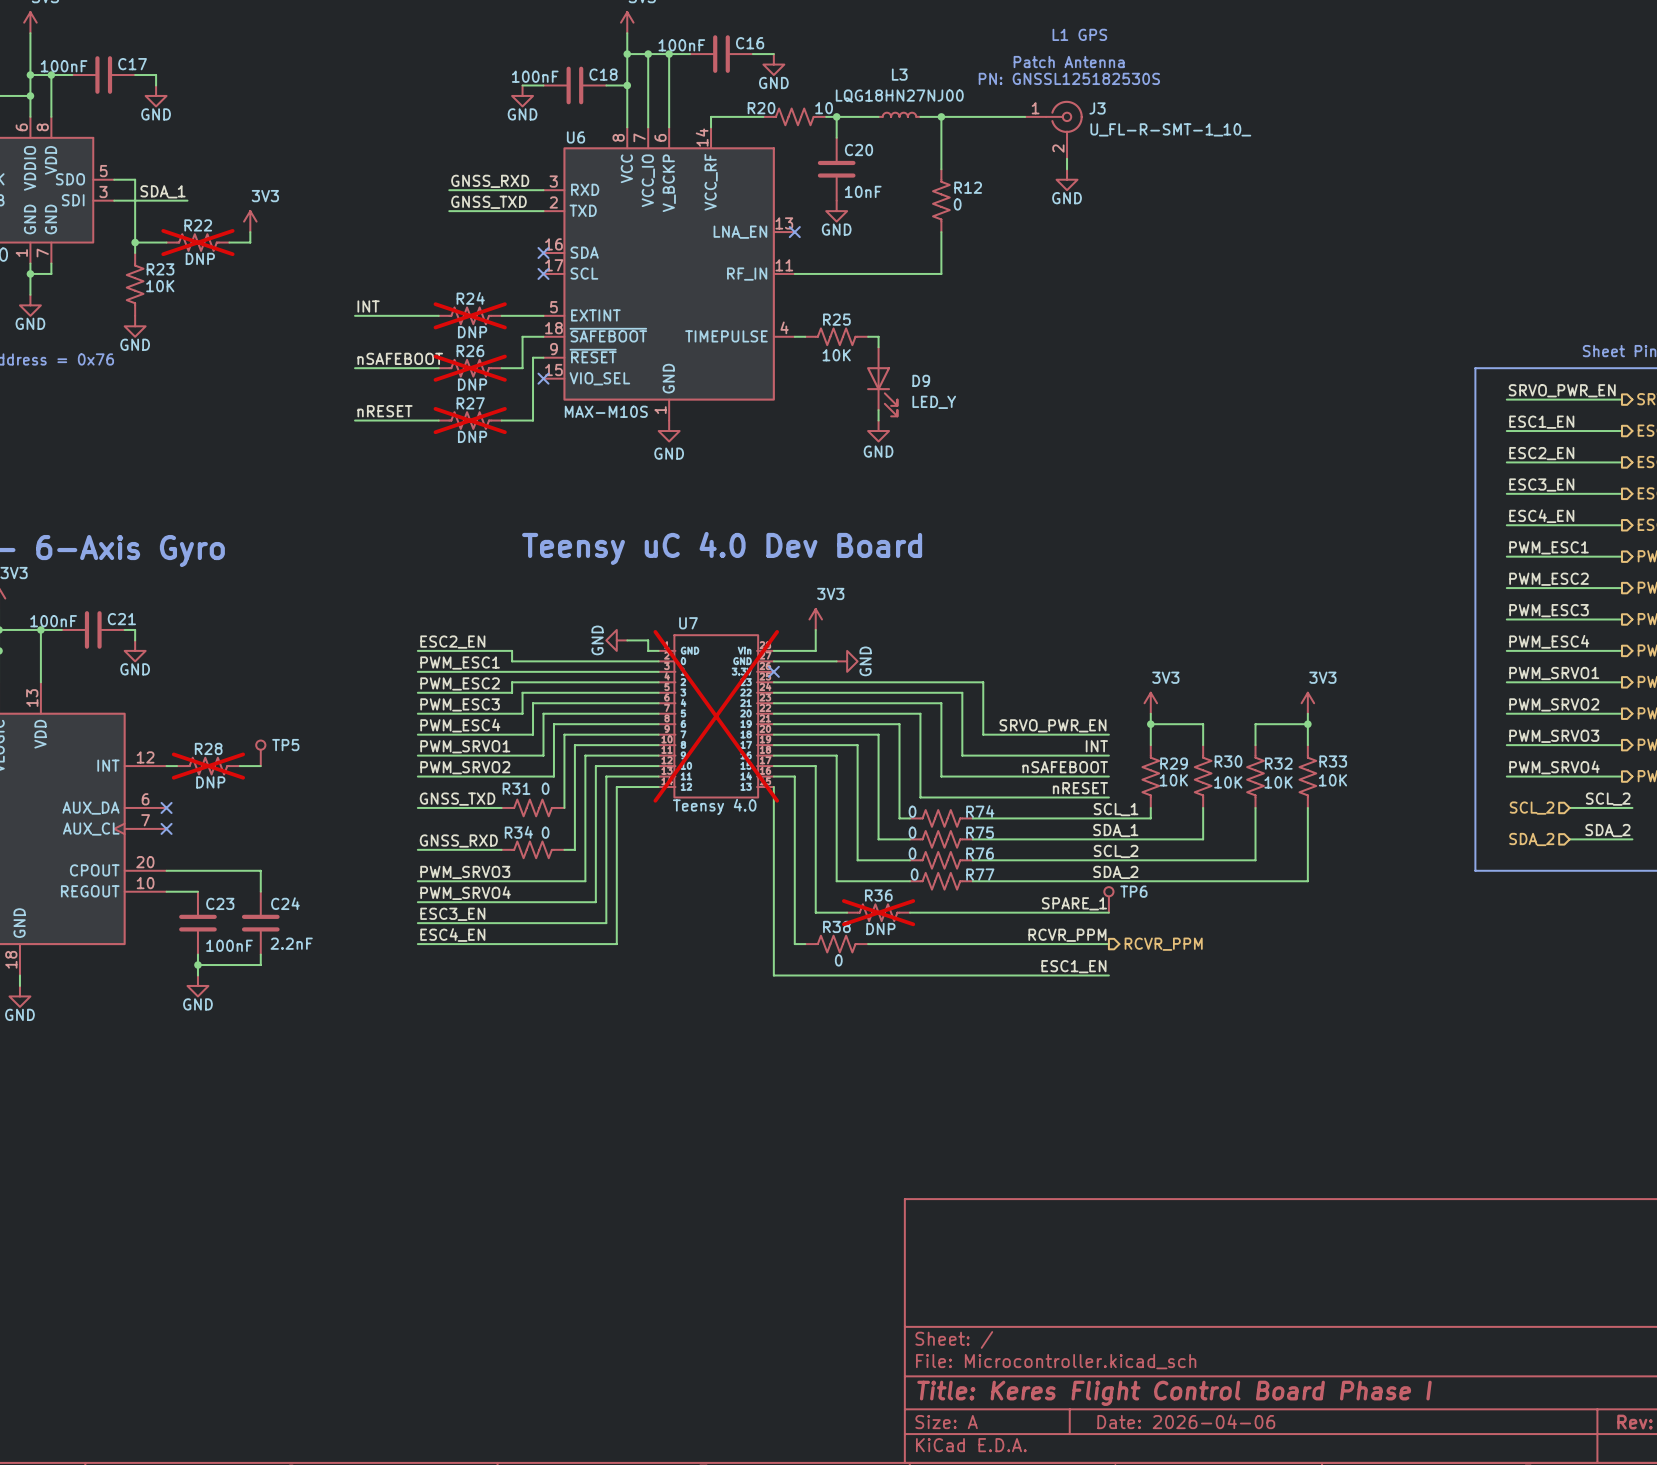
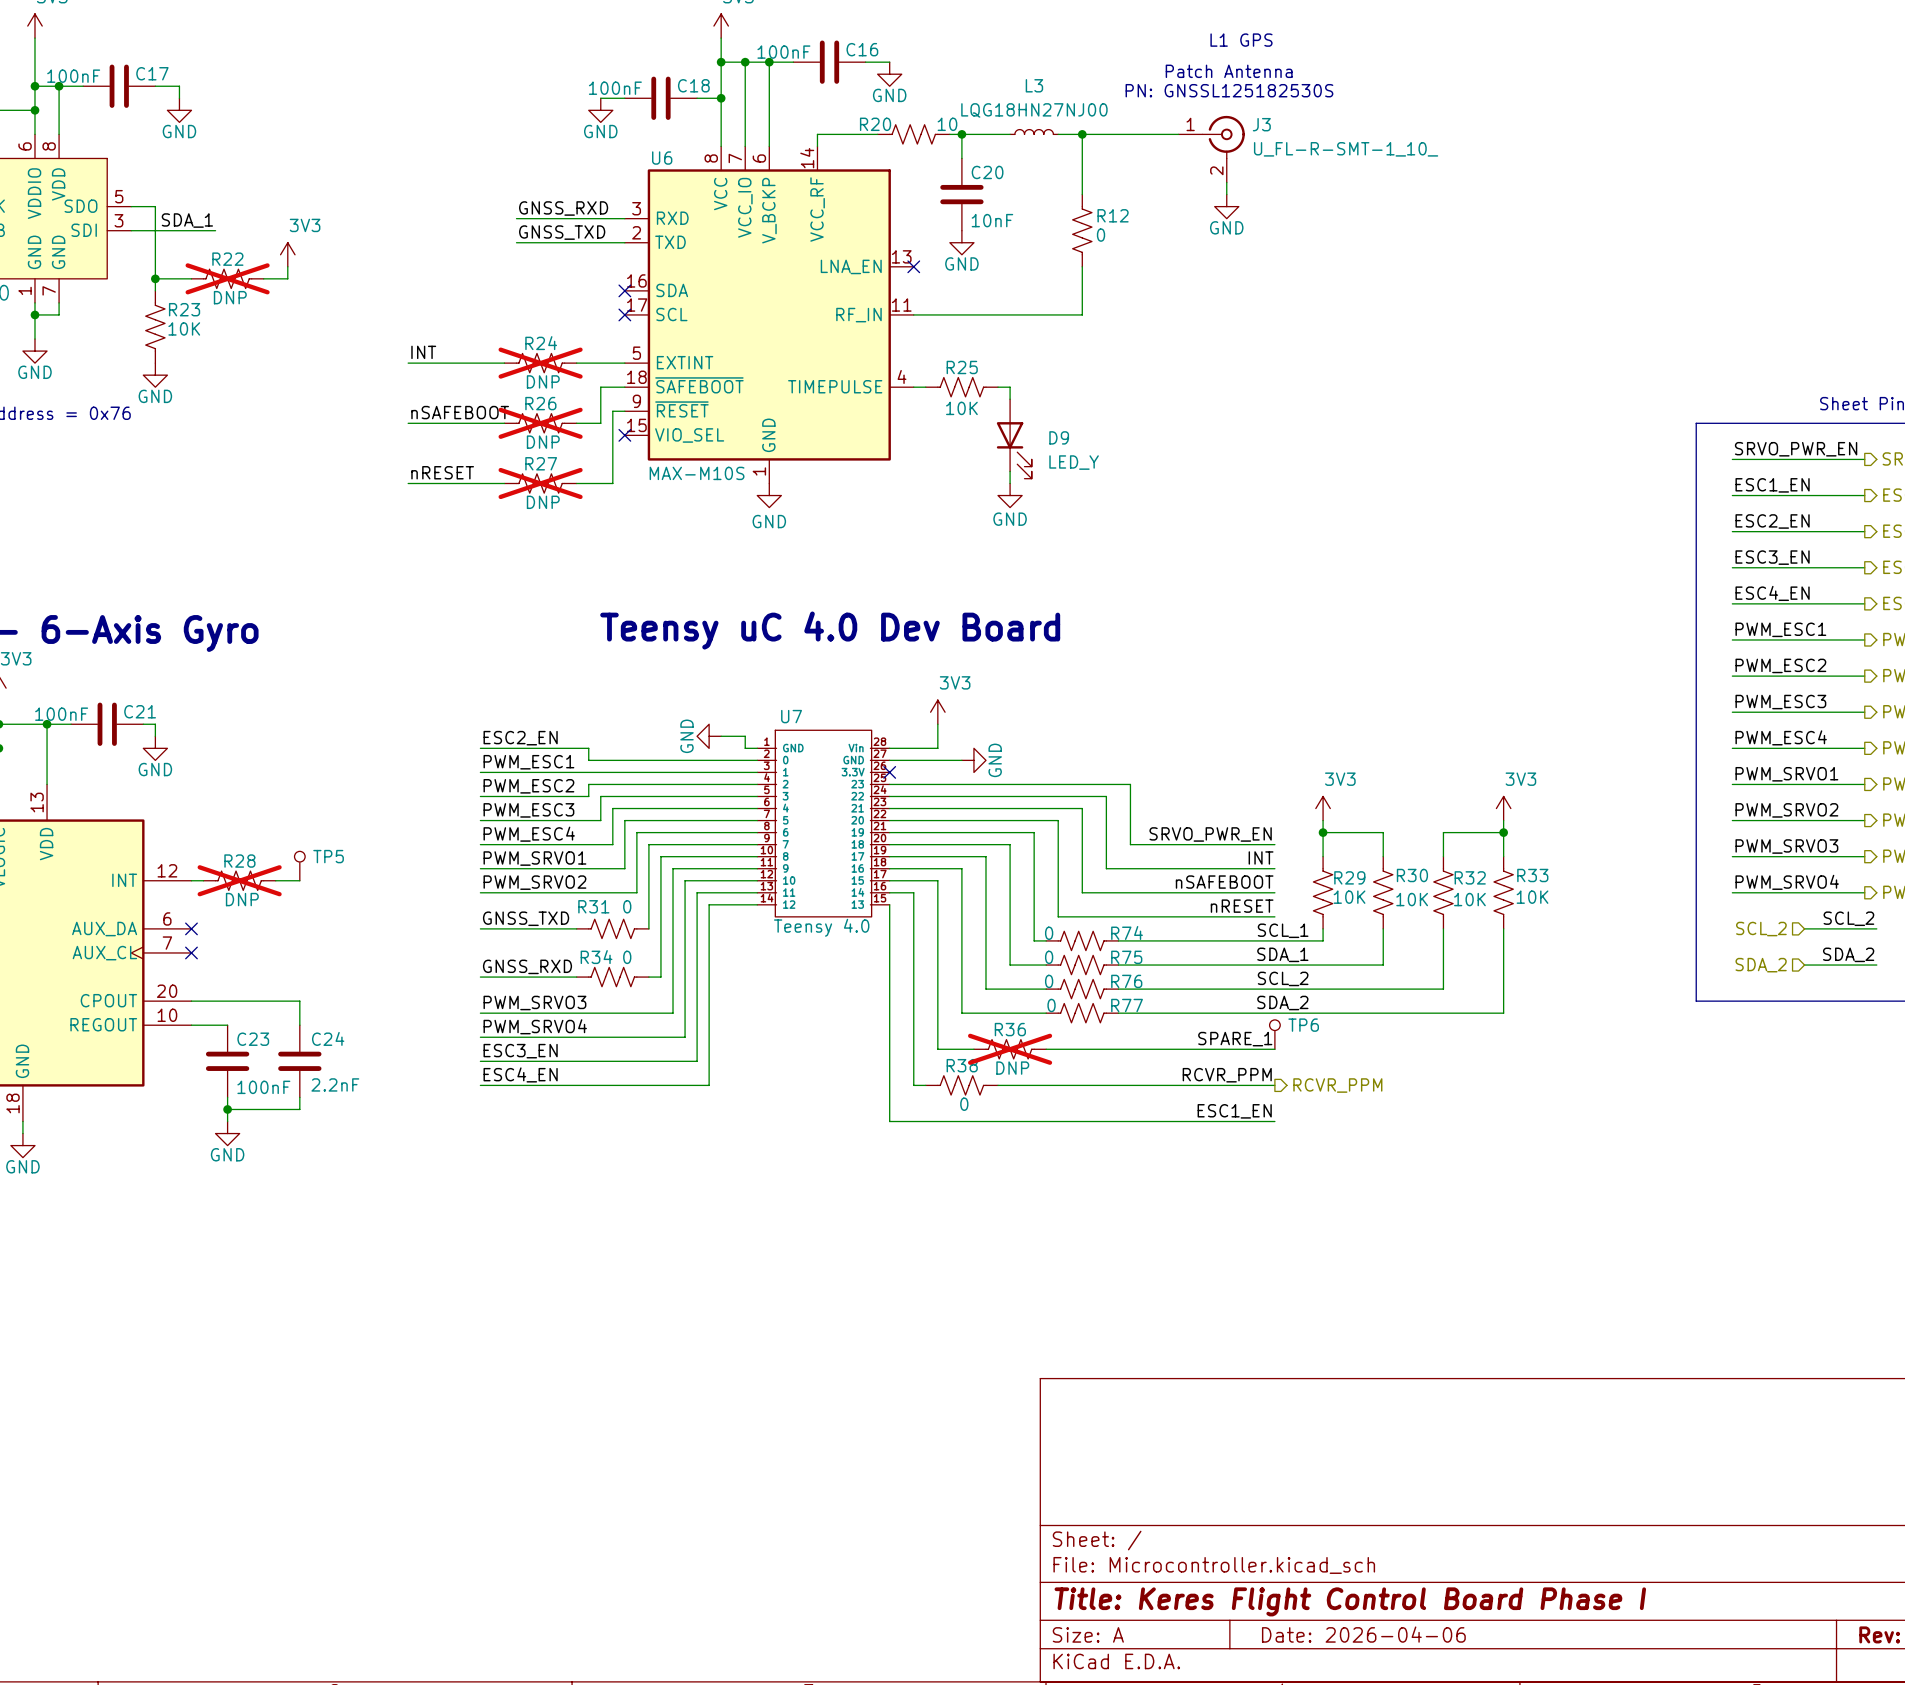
U7 do-not-place cross: (716, 716) -> none

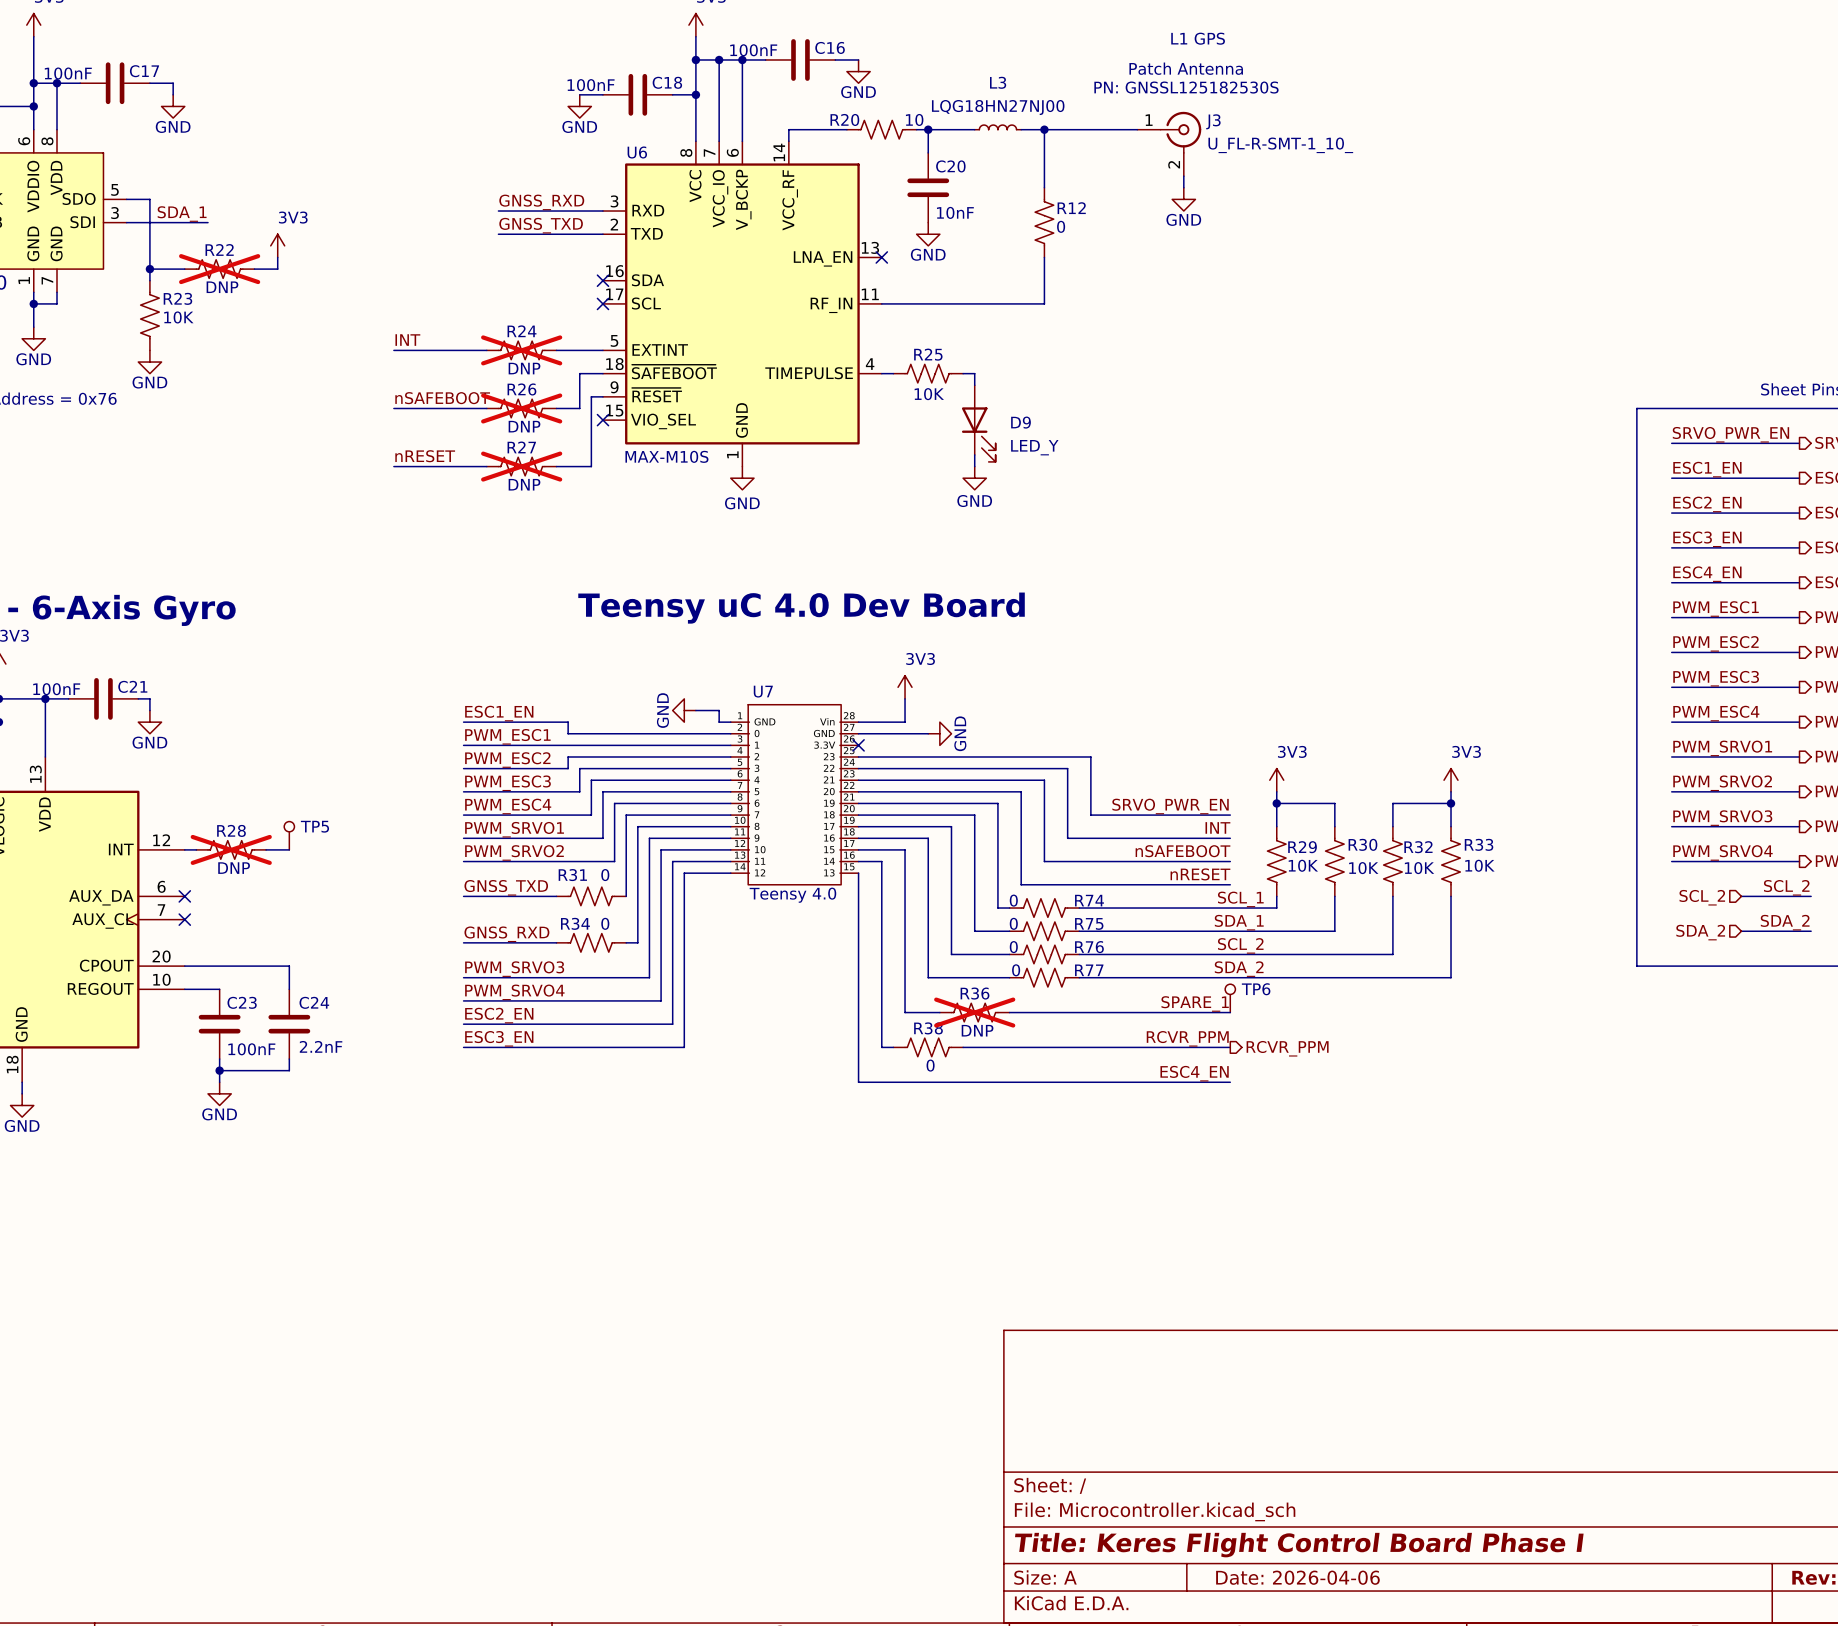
label: ESC2_EN (520, 738) -> ESC1_EN (499, 713)
label: ESC3_EN (520, 1051) -> ESC2_EN (499, 1015)
label: ESC4_EN (520, 1074) -> ESC3_EN (499, 1038)
label: ESC1_EN (1234, 1111) -> ESC4_EN (1194, 1073)

